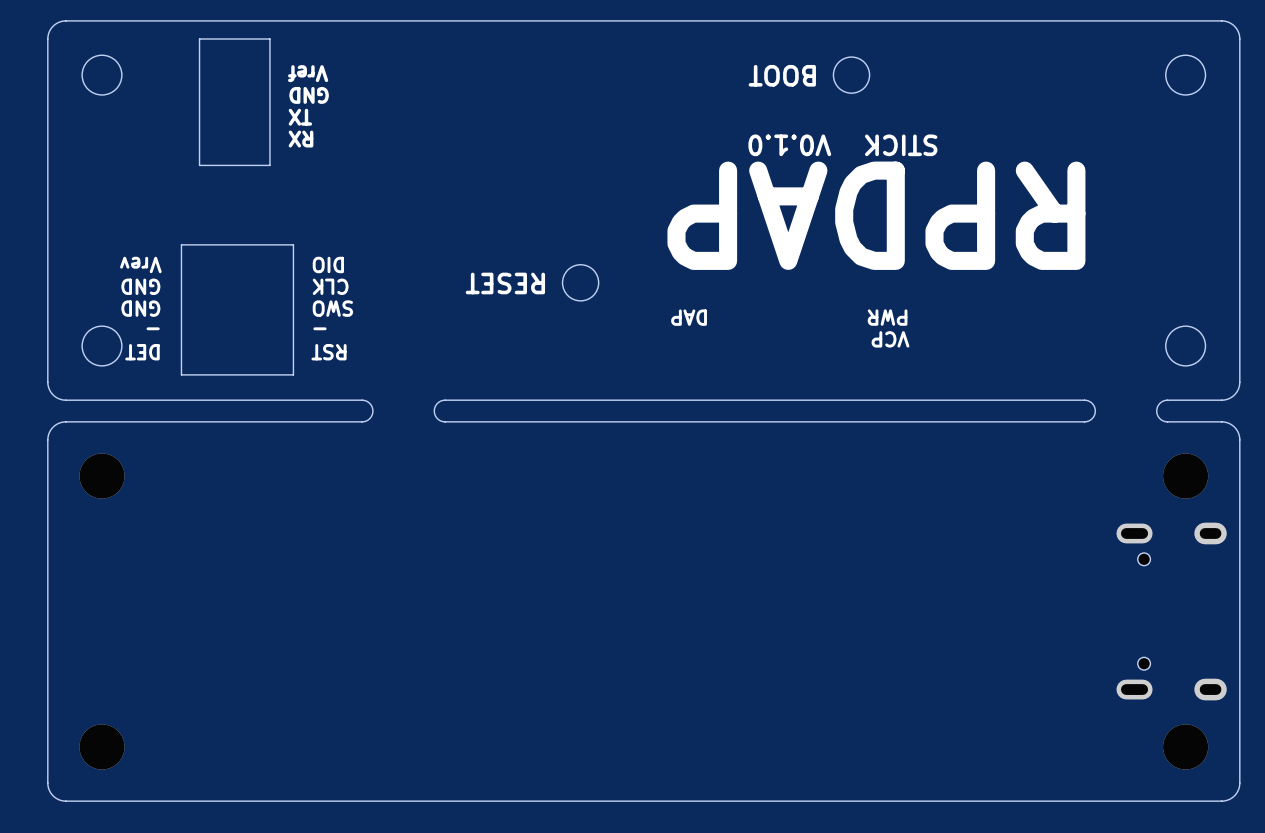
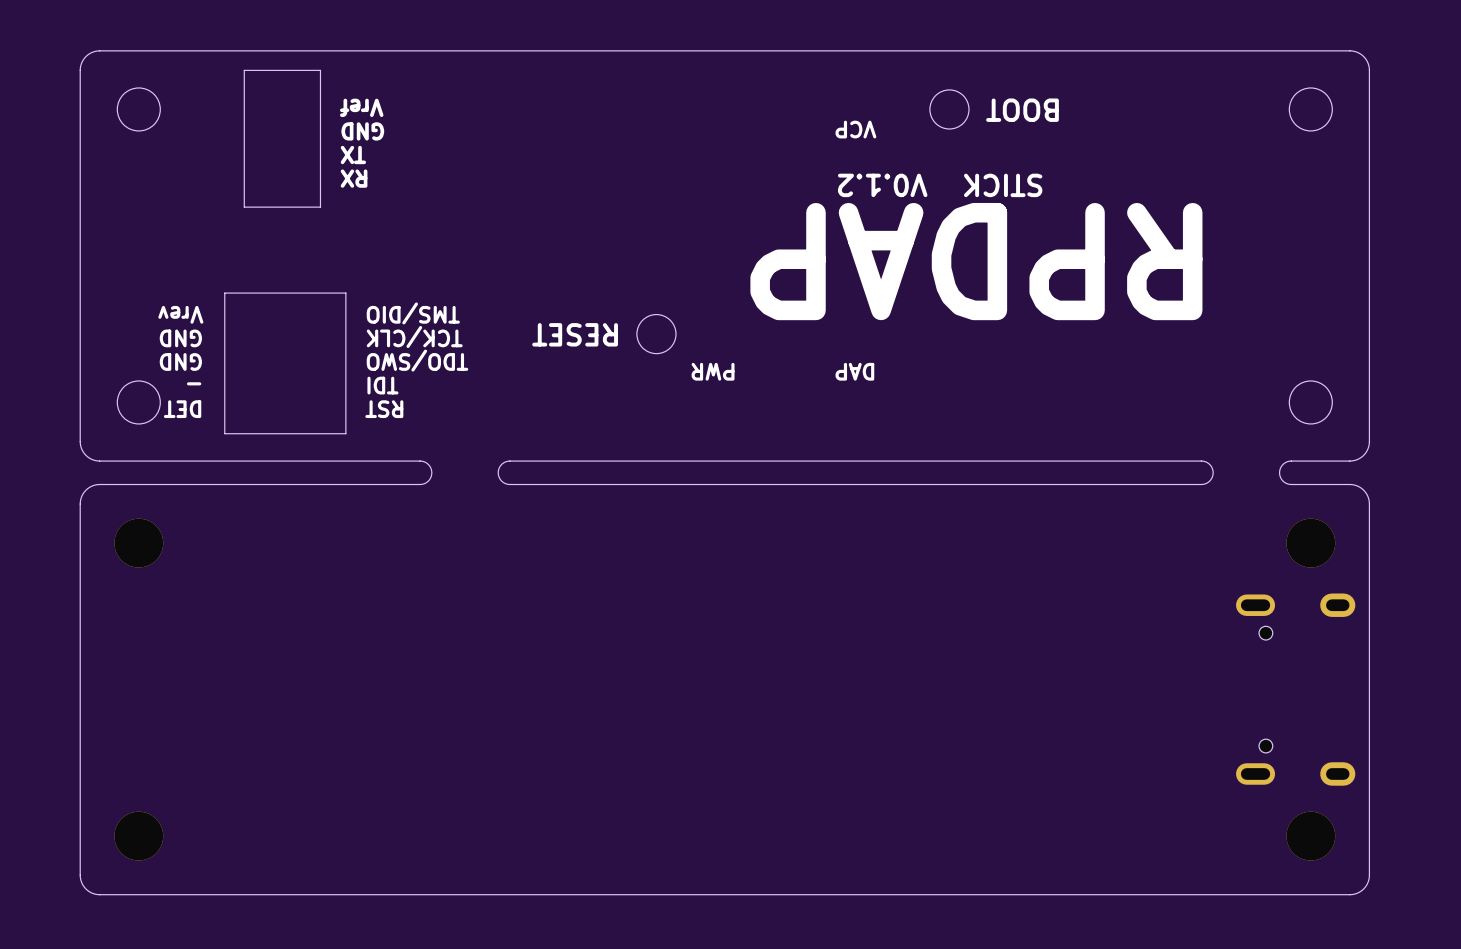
text position: BOOT (782, 75) -> BOOT (1022, 110)
text: V0.1.0 (789, 145) -> V0.1.2 (882, 185)
text: DIO (328, 264) -> TMS/DIO (413, 313)
text: CLK (330, 286) -> TCK/CLK (414, 337)
text: SWO (332, 308) -> TDO/SWO (417, 360)
text position: DAP (689, 317) -> DAP (854, 371)
text position: PWR (887, 317) -> PWR (713, 371)
text: - (319, 328) -> TDI (382, 385)
text position: VCP (890, 339) -> VCP (855, 129)

